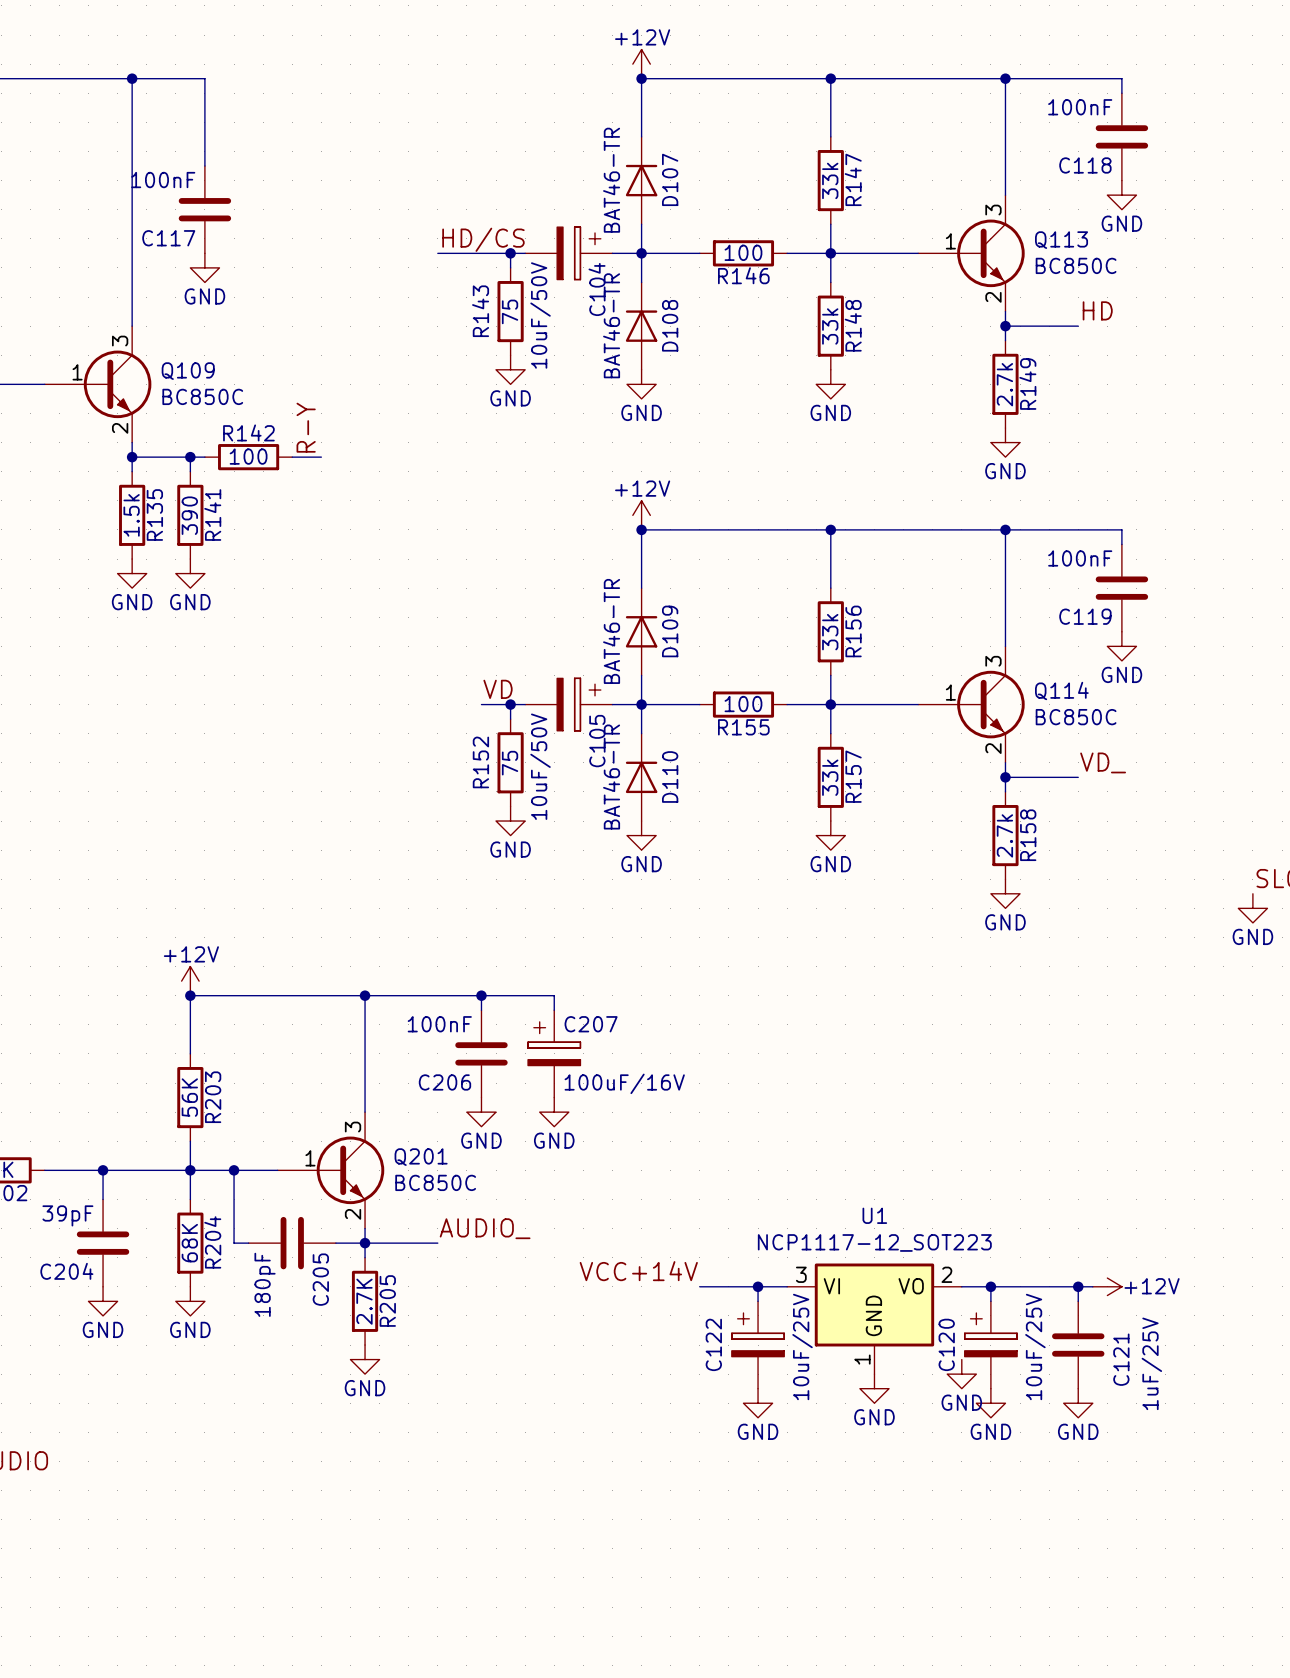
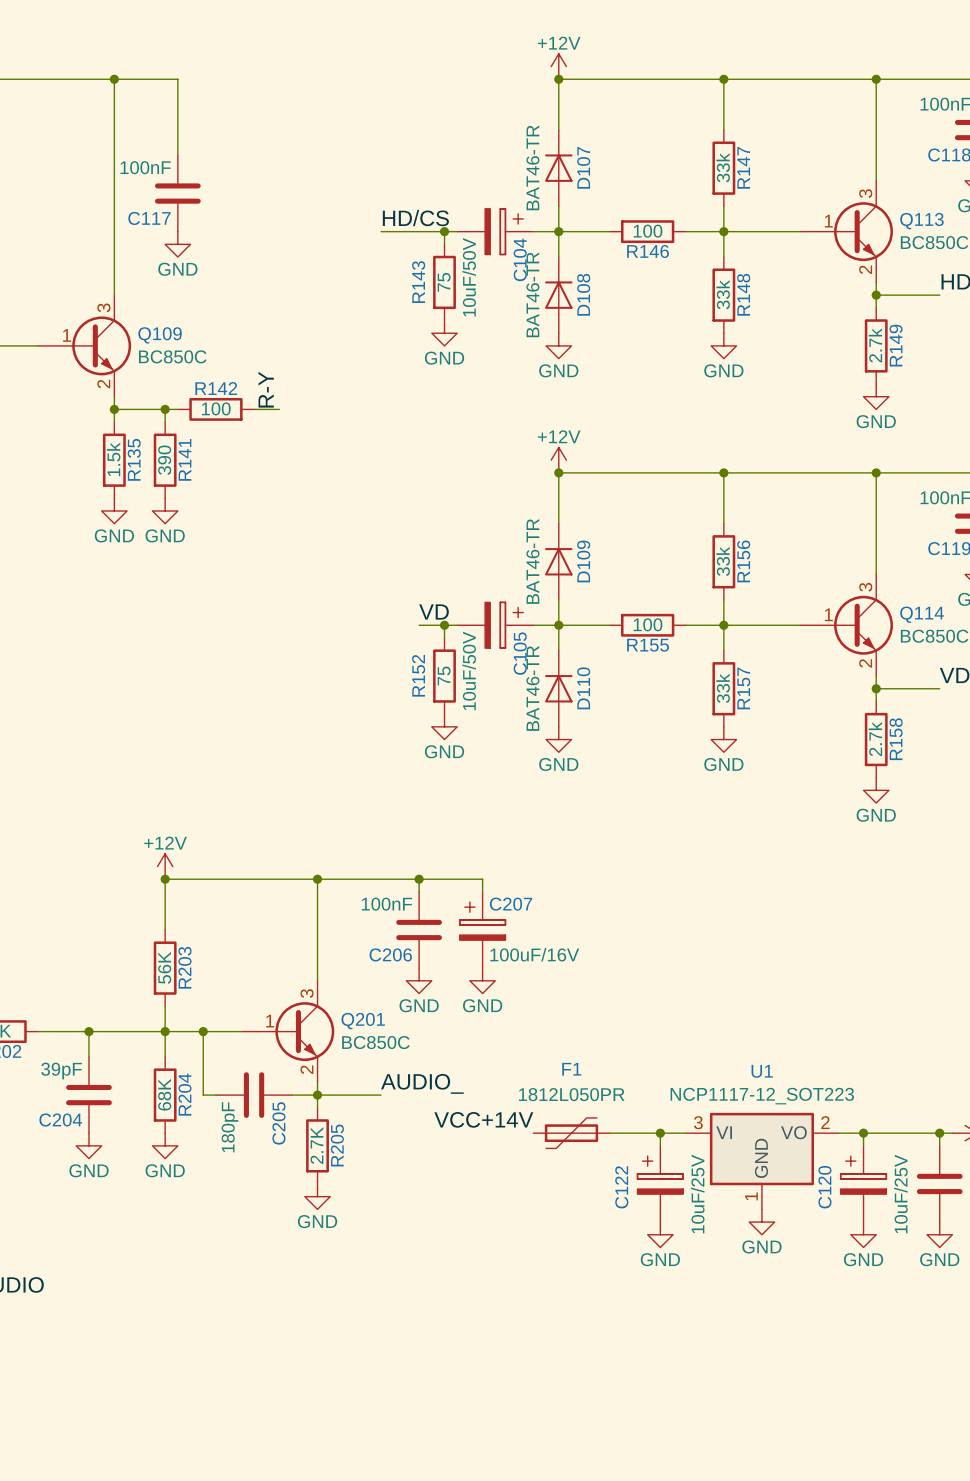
label position: VCC+14V (638, 1271) -> VCC+14V (483, 1119)
F1: none -> 1812L050PR (571, 1133)
power symbol: GND (961, 1374) -> none

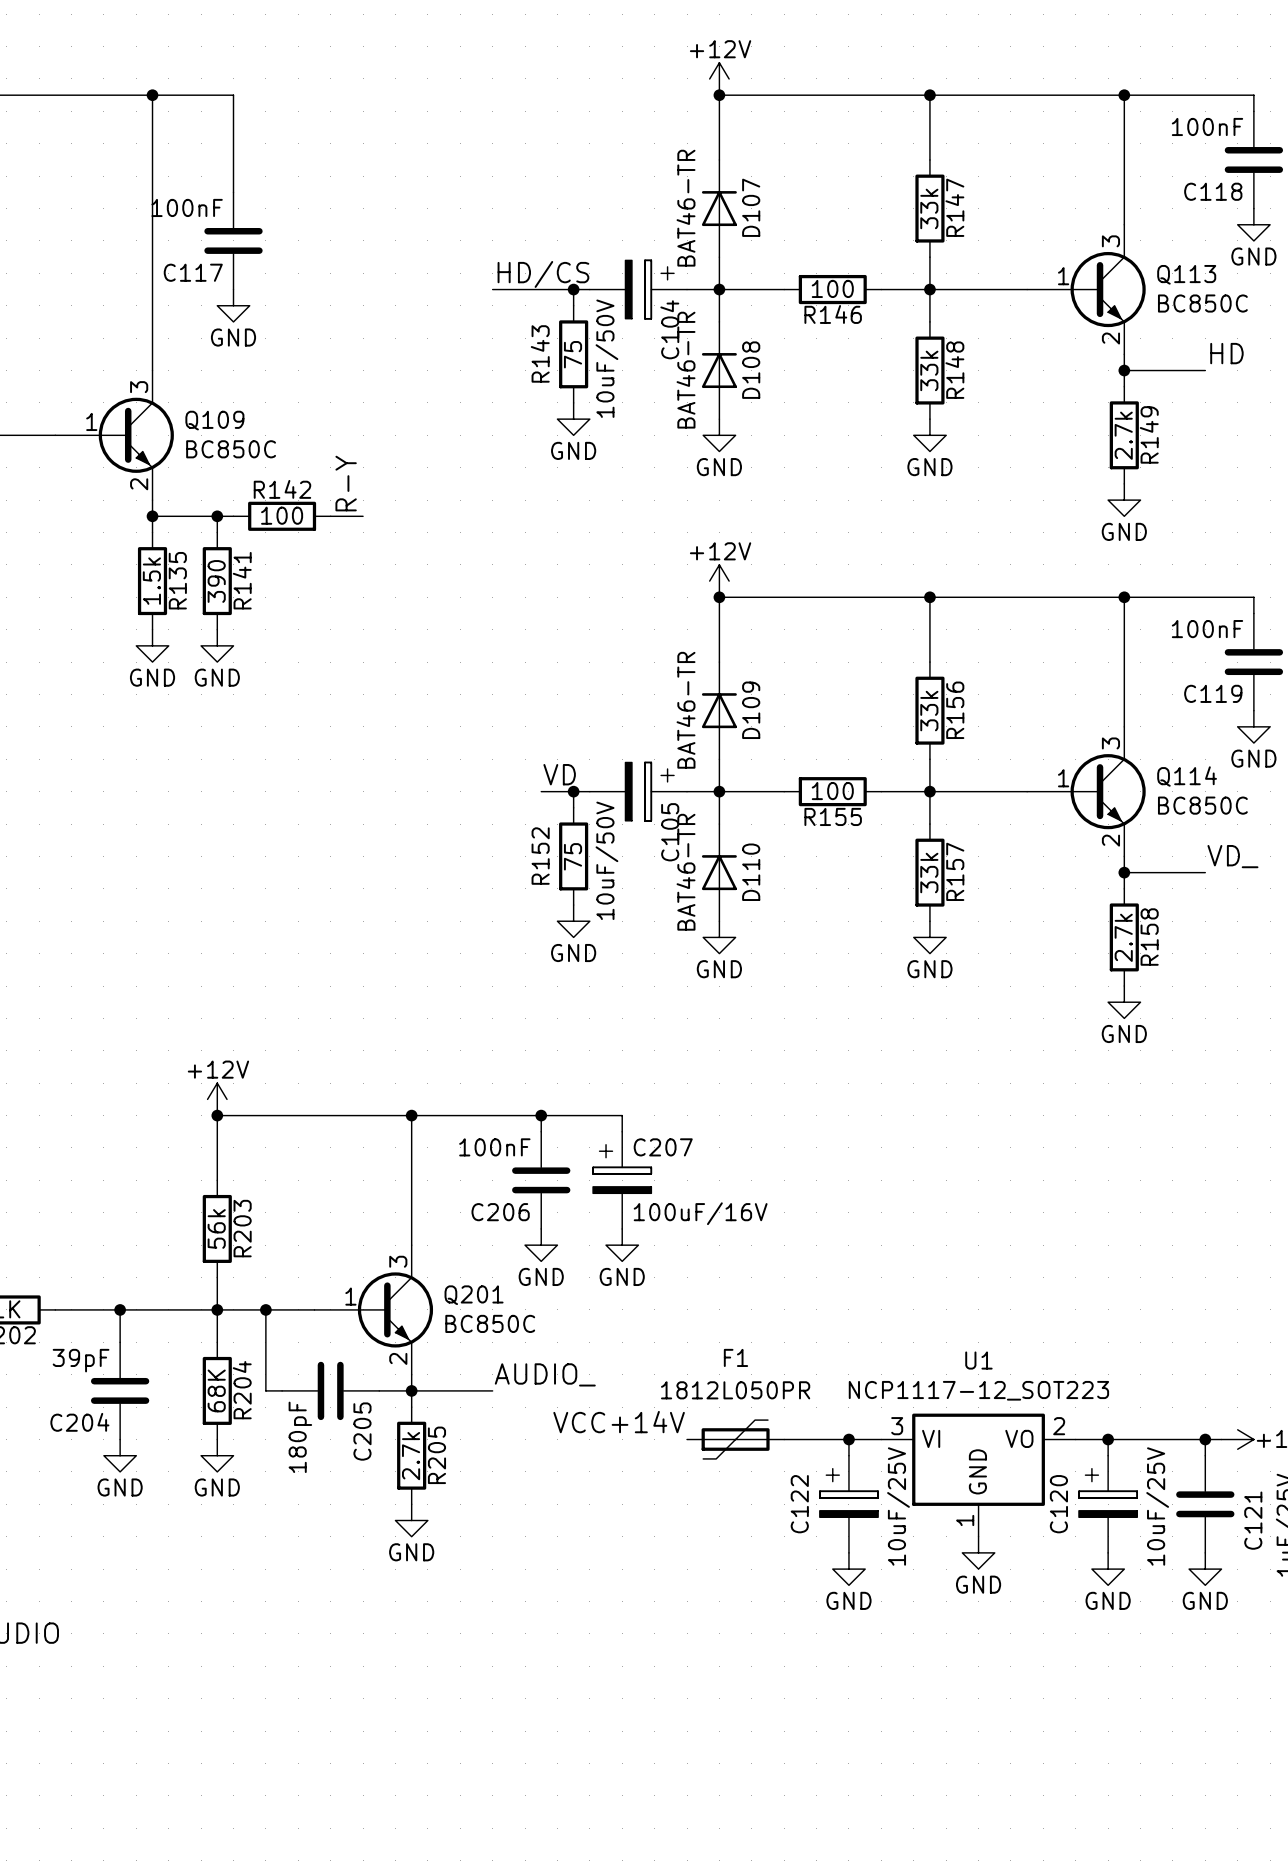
R203 value: 56K (164, 967) -> 56k (216, 1228)
R205 value: 2.7K (316, 1145) -> 2.7k (411, 1456)

